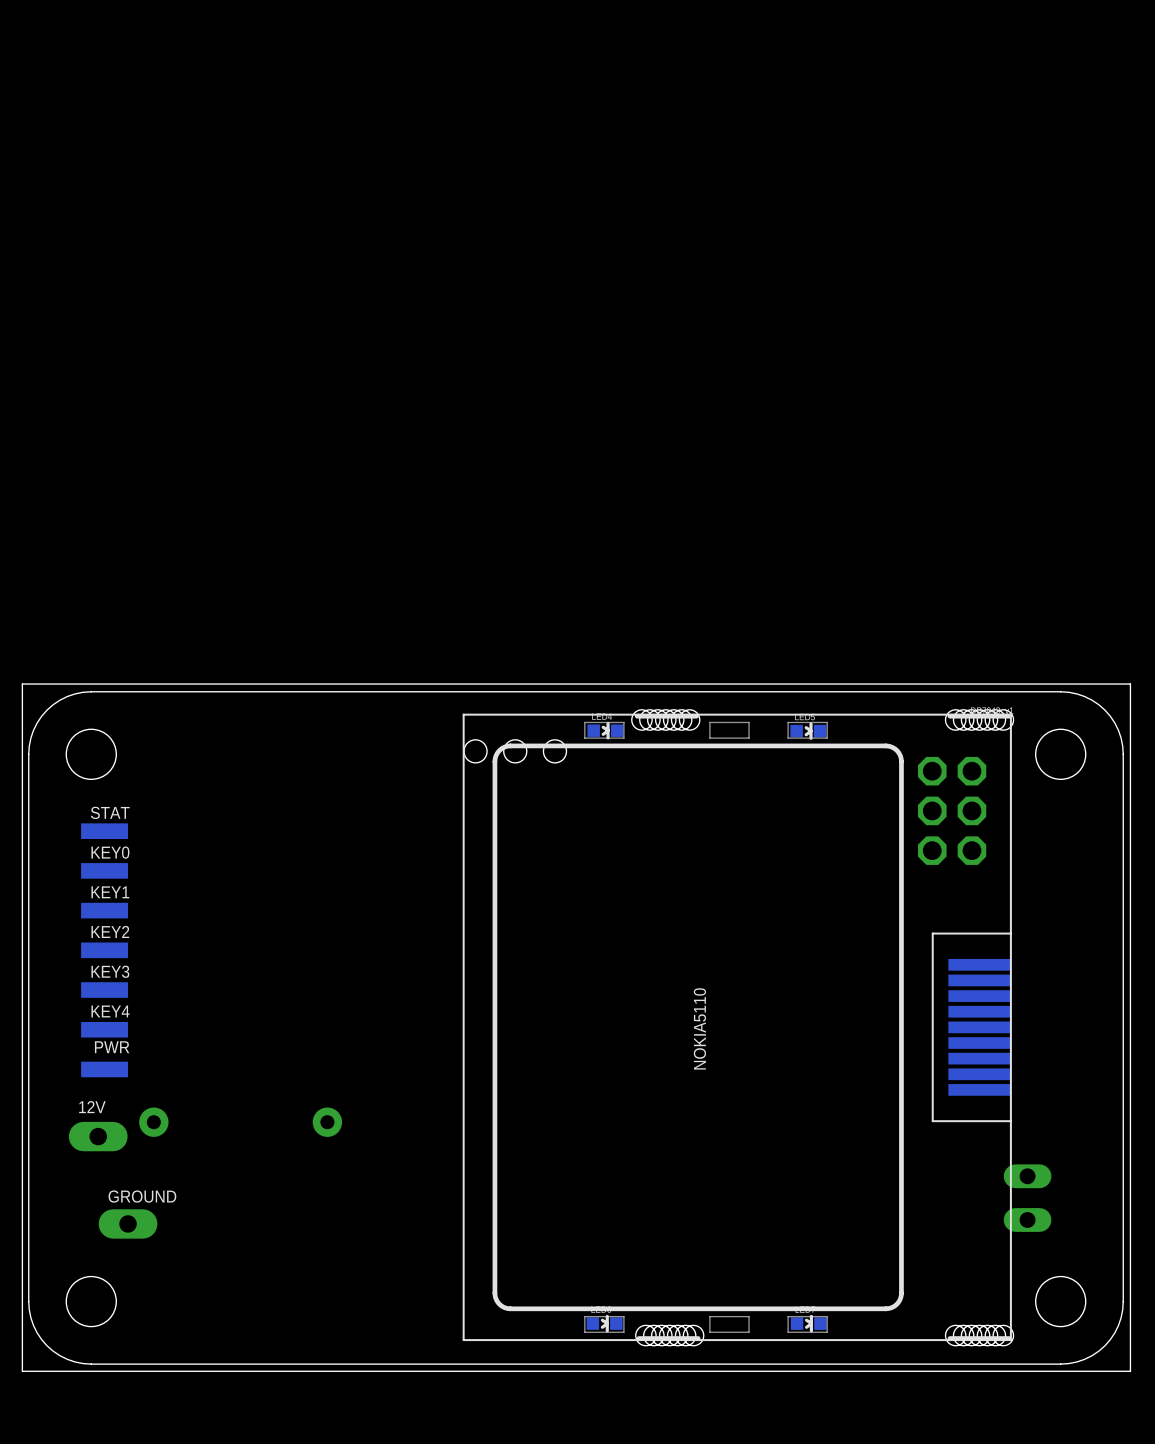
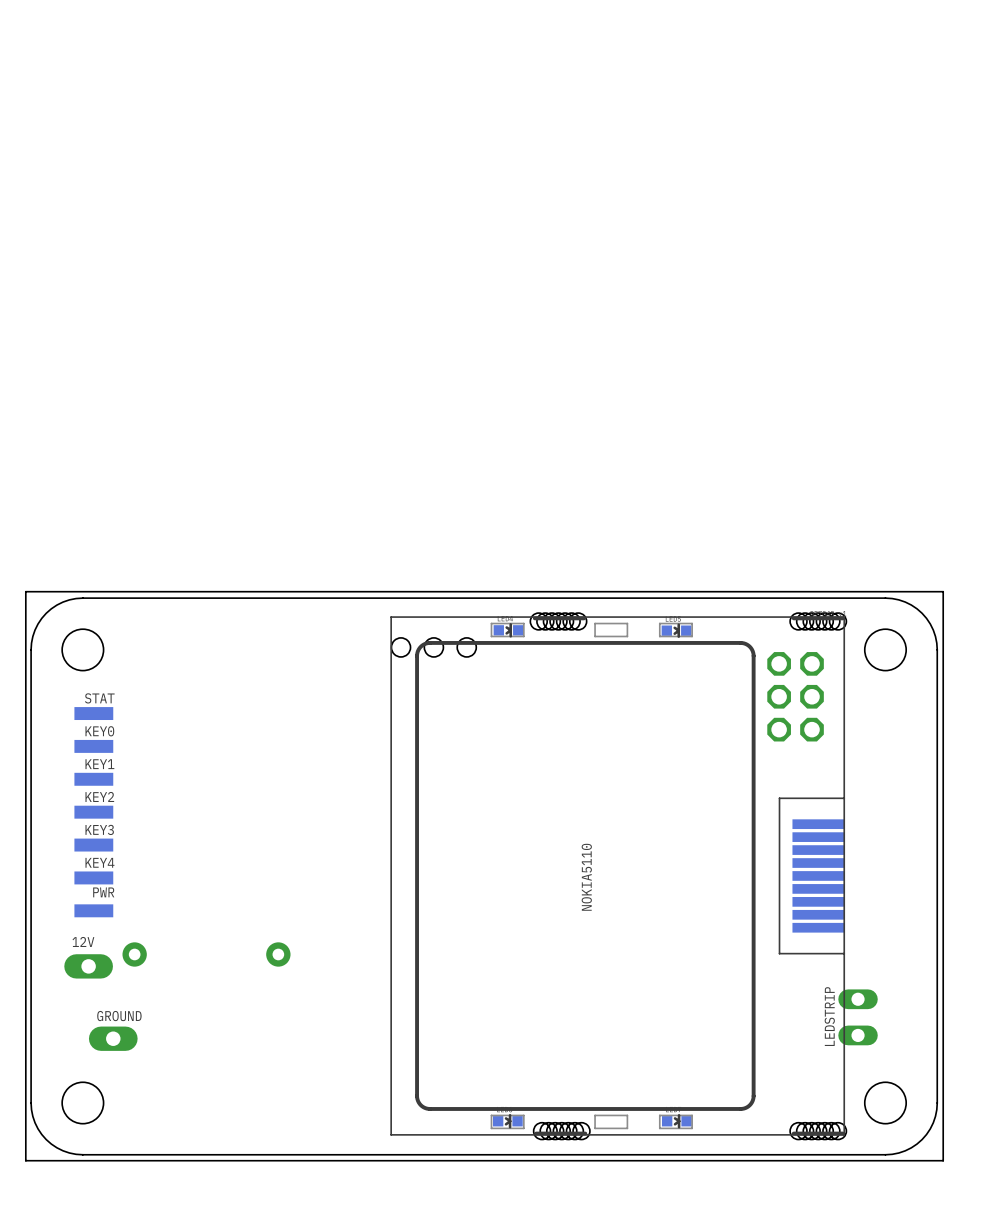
text: none -> LEDSTRIP (829, 1016)

